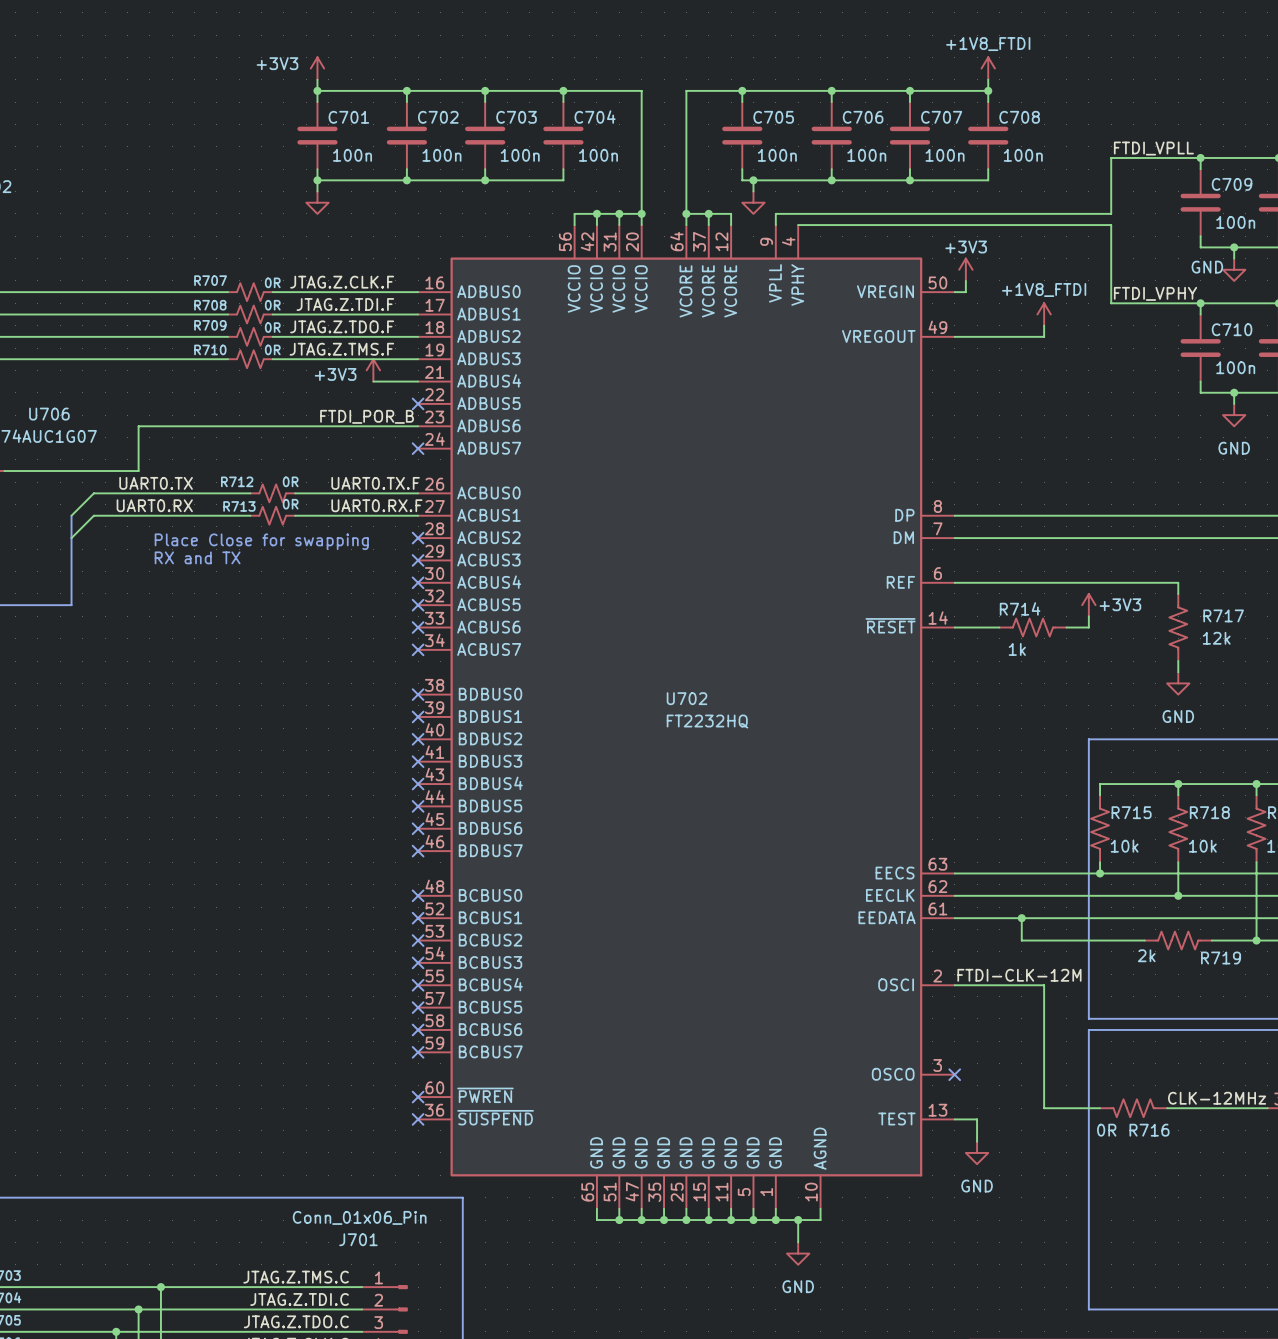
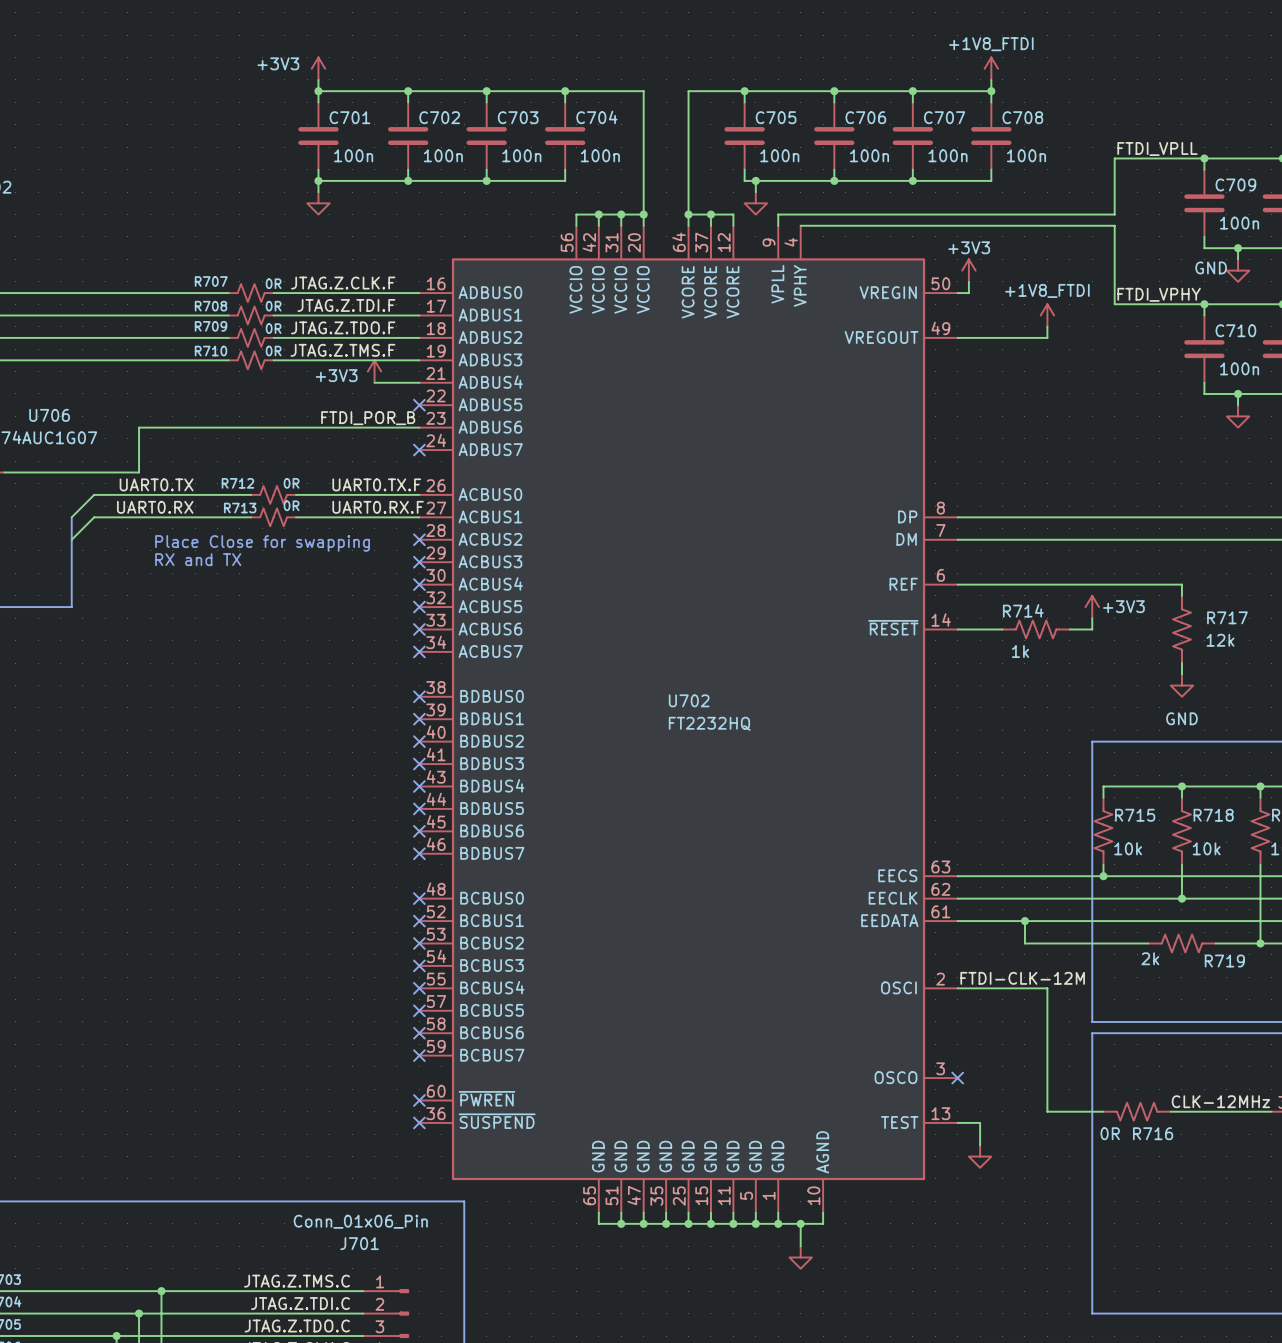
power symbol text: GND (1234, 448) -> none
power symbol text: GND (977, 1186) -> none
power symbol text: GND (798, 1286) -> none

